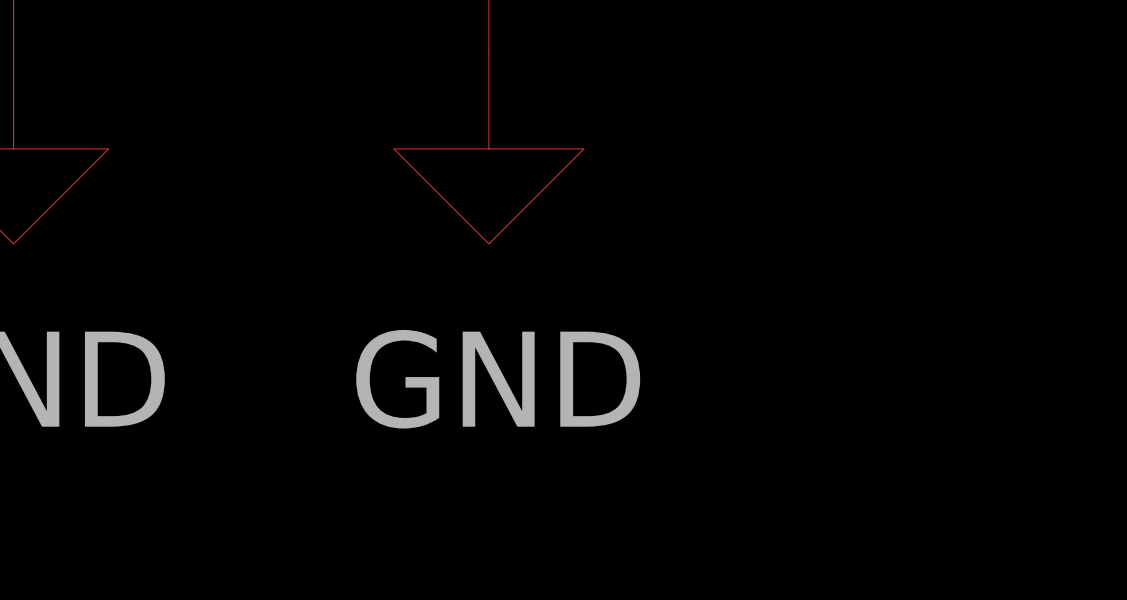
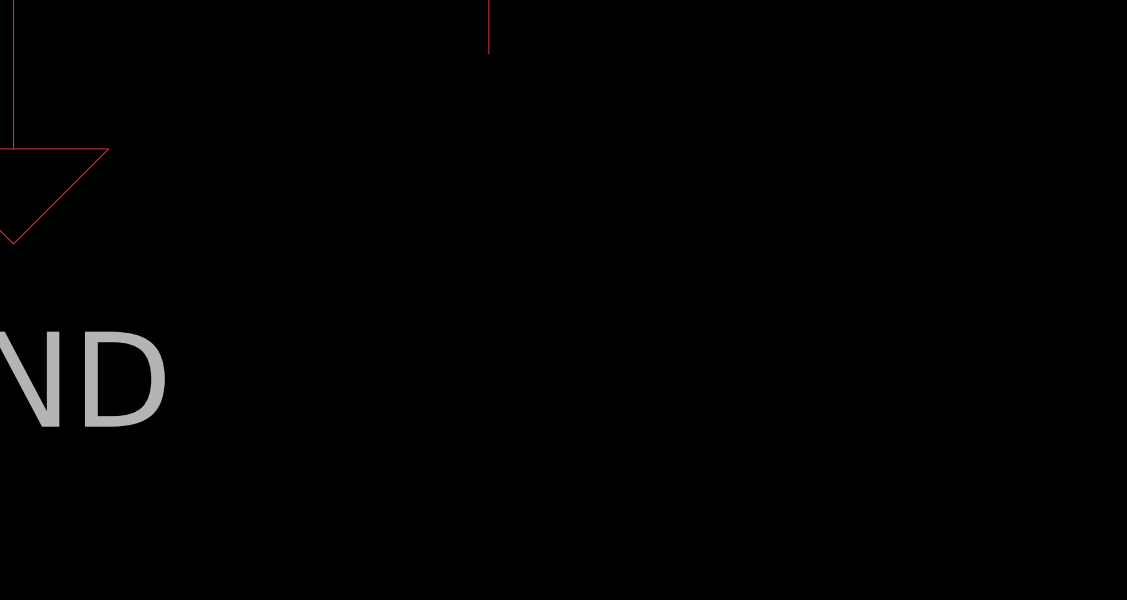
power symbol: GND (488, 148) -> none

